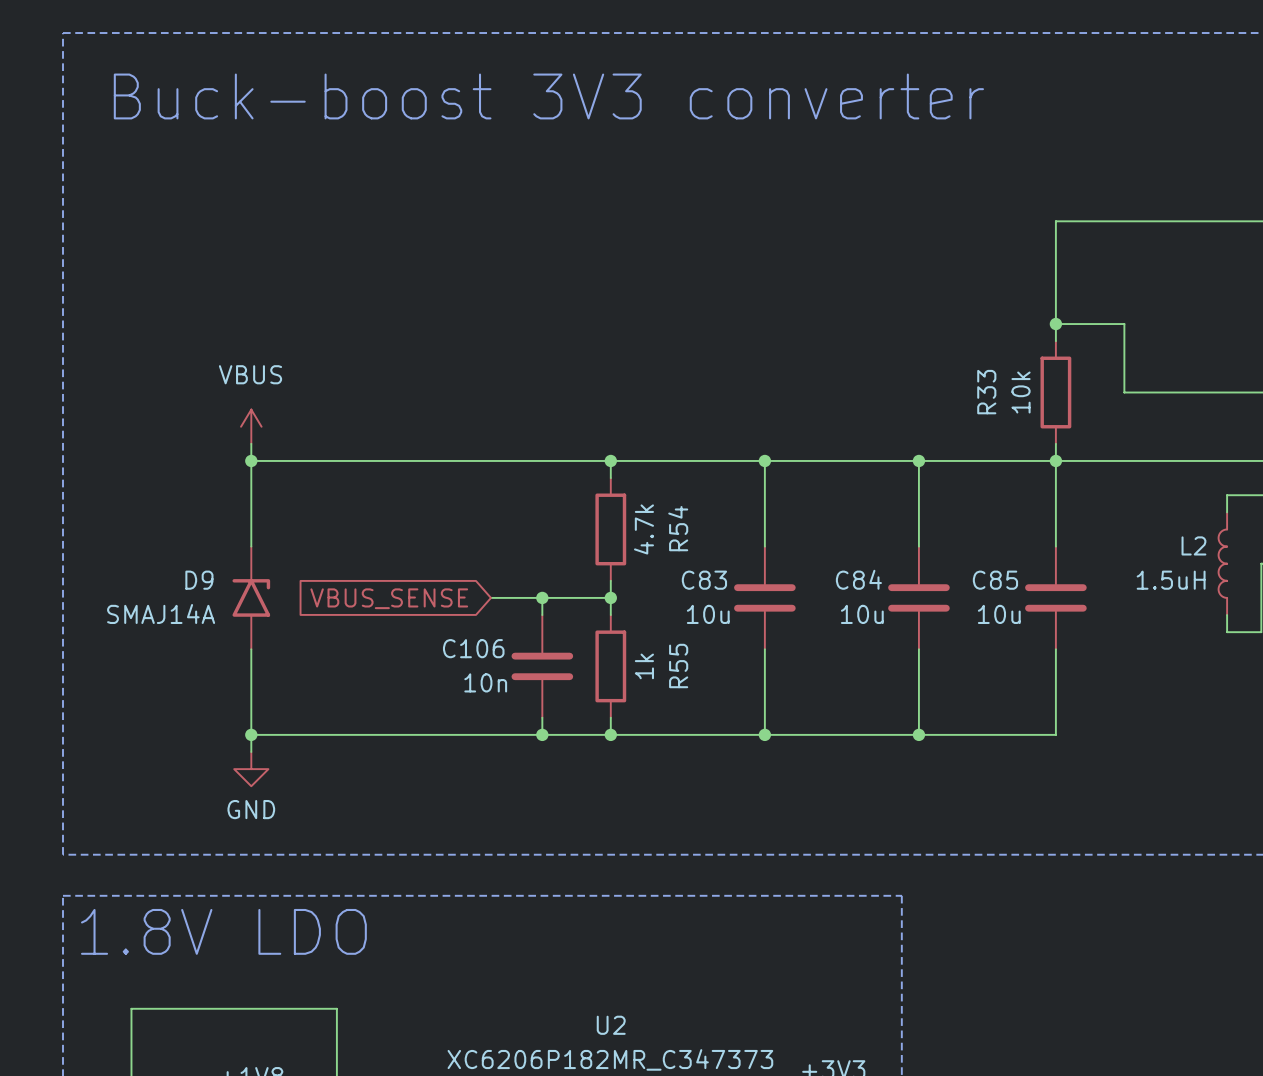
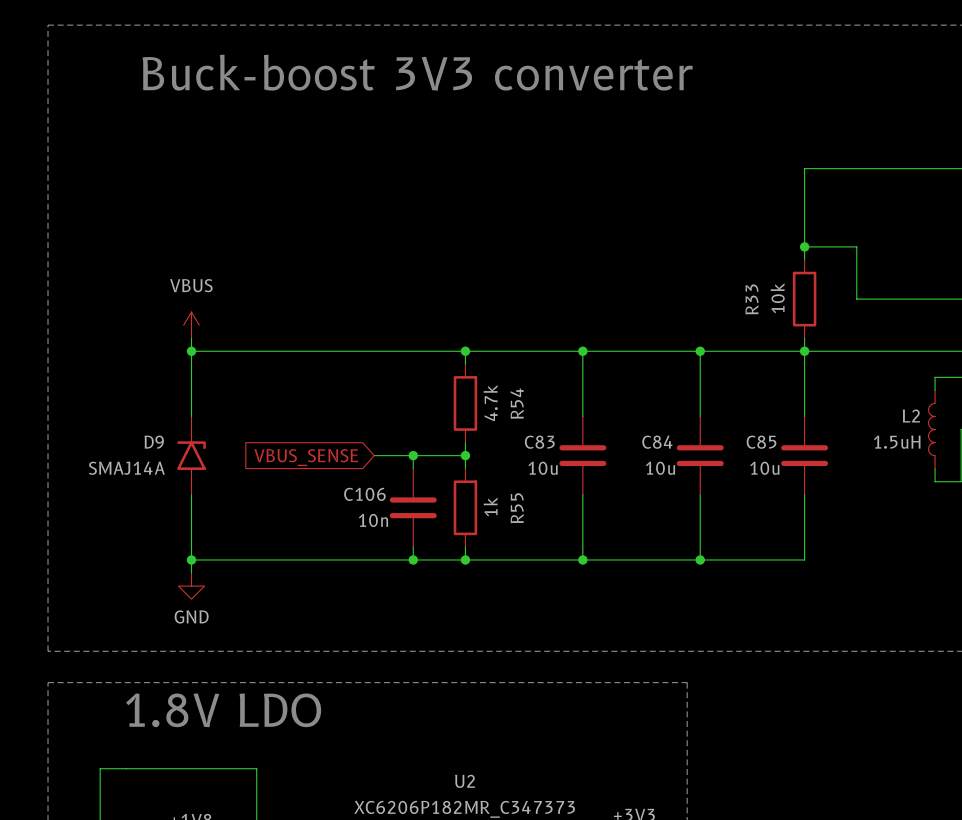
text position: 1.8V LDO (223, 931) -> 1.8V LDO (223, 710)

